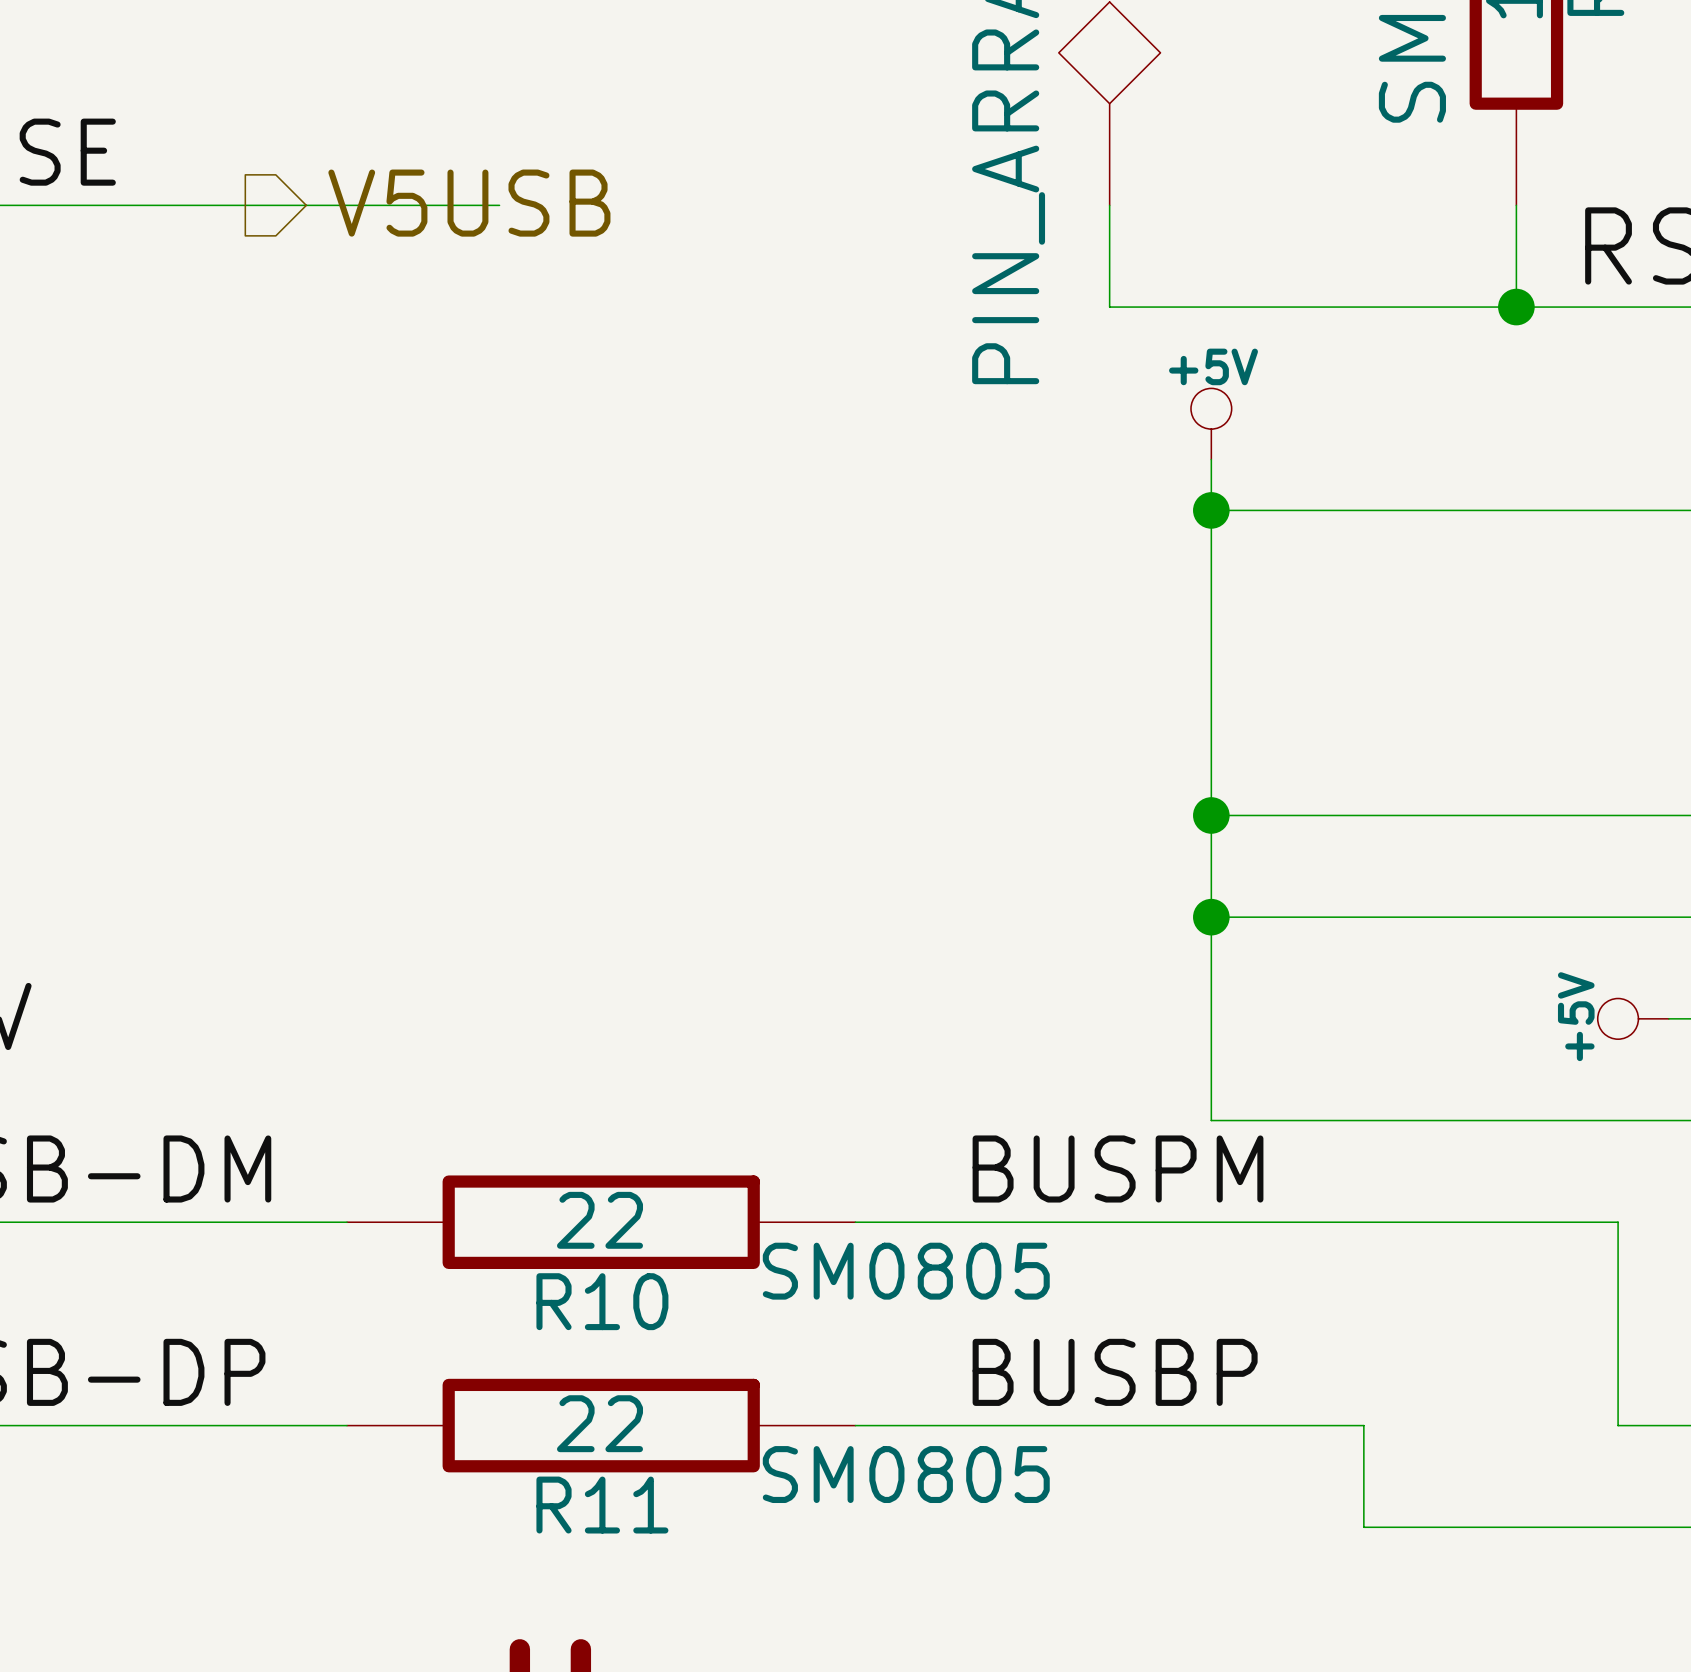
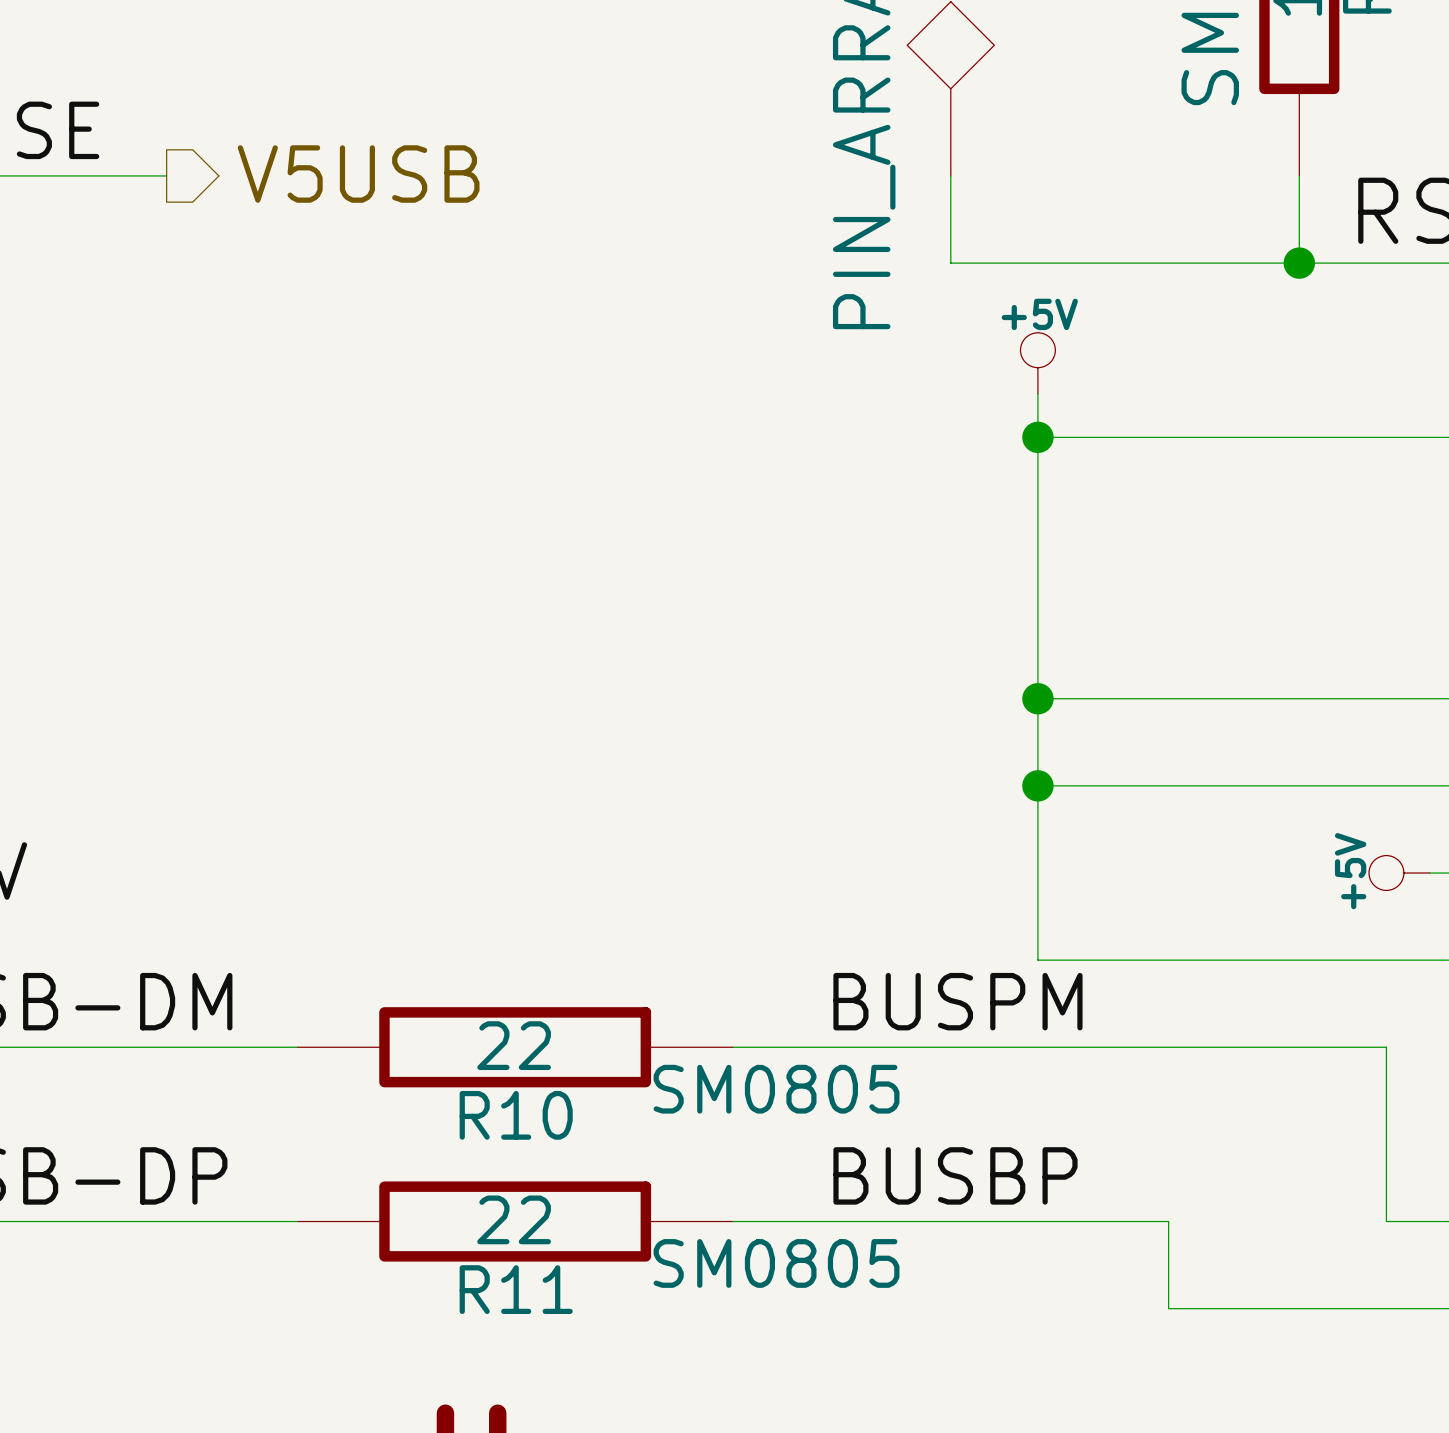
hierarchical label position: V5USB (469, 203) -> V5USB (358, 174)
wire: (194, 205) (499, 205) -> none

